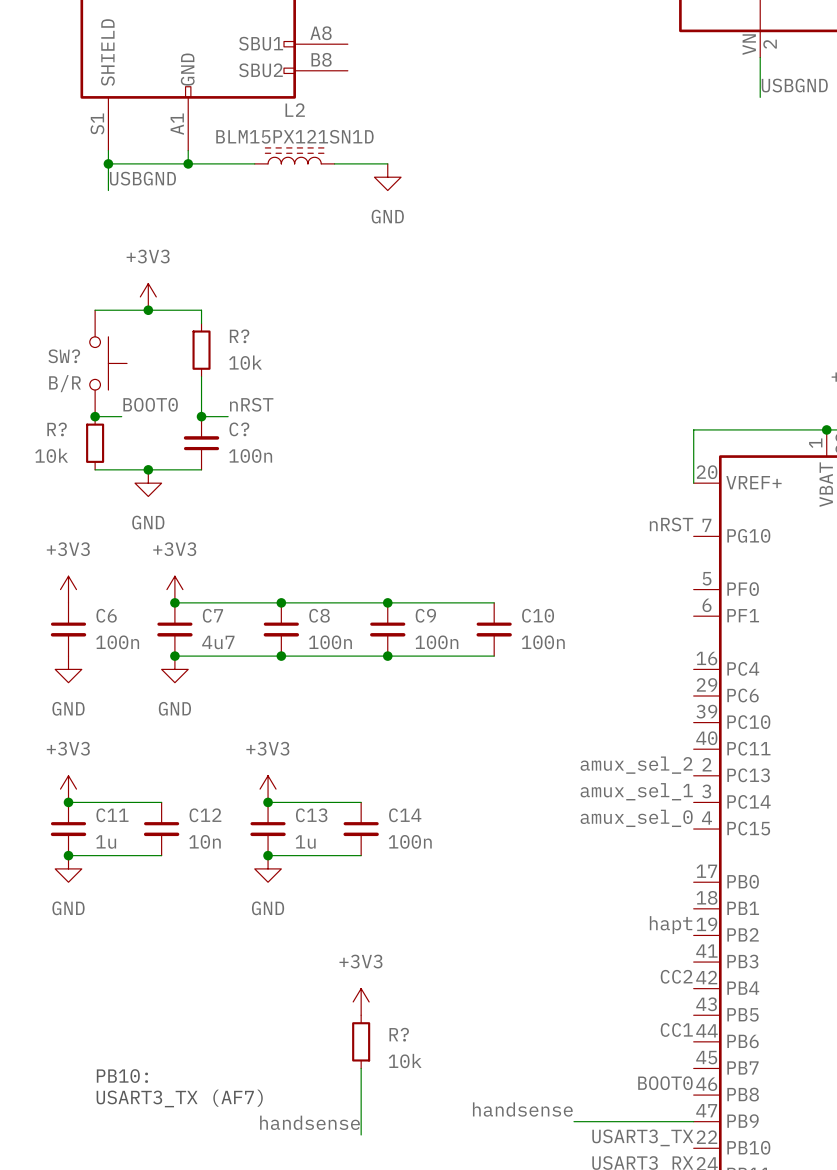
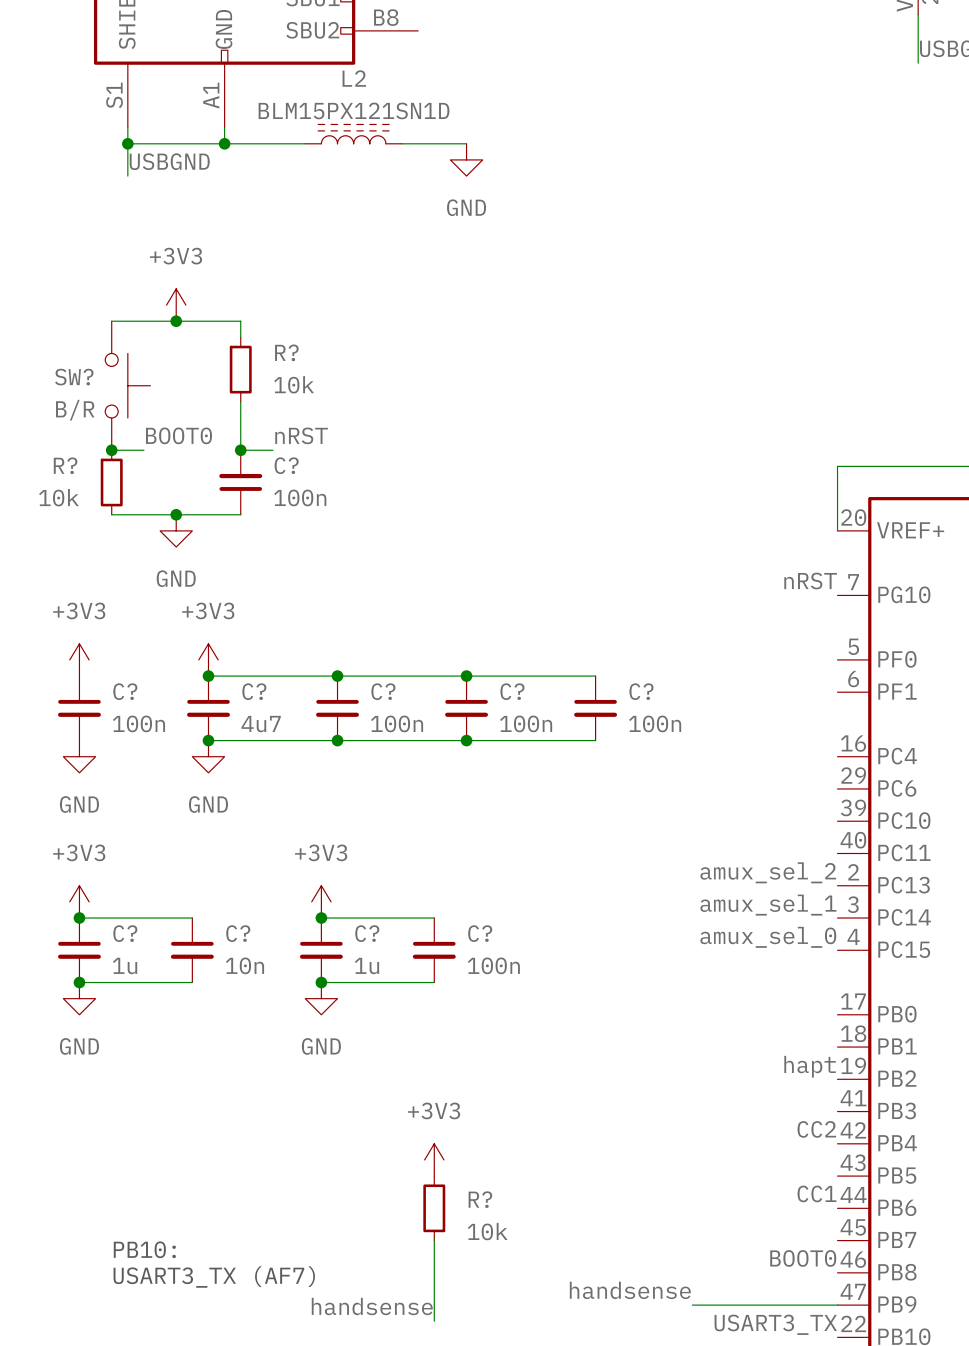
C6 name: C6 (106, 615) -> C? (125, 691)
C7 name: C7 (212, 615) -> C? (254, 691)
C8 name: C8 (319, 615) -> C? (383, 691)
C9 name: C9 (425, 615) -> C? (512, 691)
C10 name: C10 (538, 615) -> C? (641, 691)
C11 name: C11 (112, 815) -> C? (125, 933)
C12 name: C12 (205, 815) -> C? (238, 933)
C13 name: C13 (311, 815) -> C? (367, 933)
C14 name: C14 (405, 815) -> C? (480, 933)

